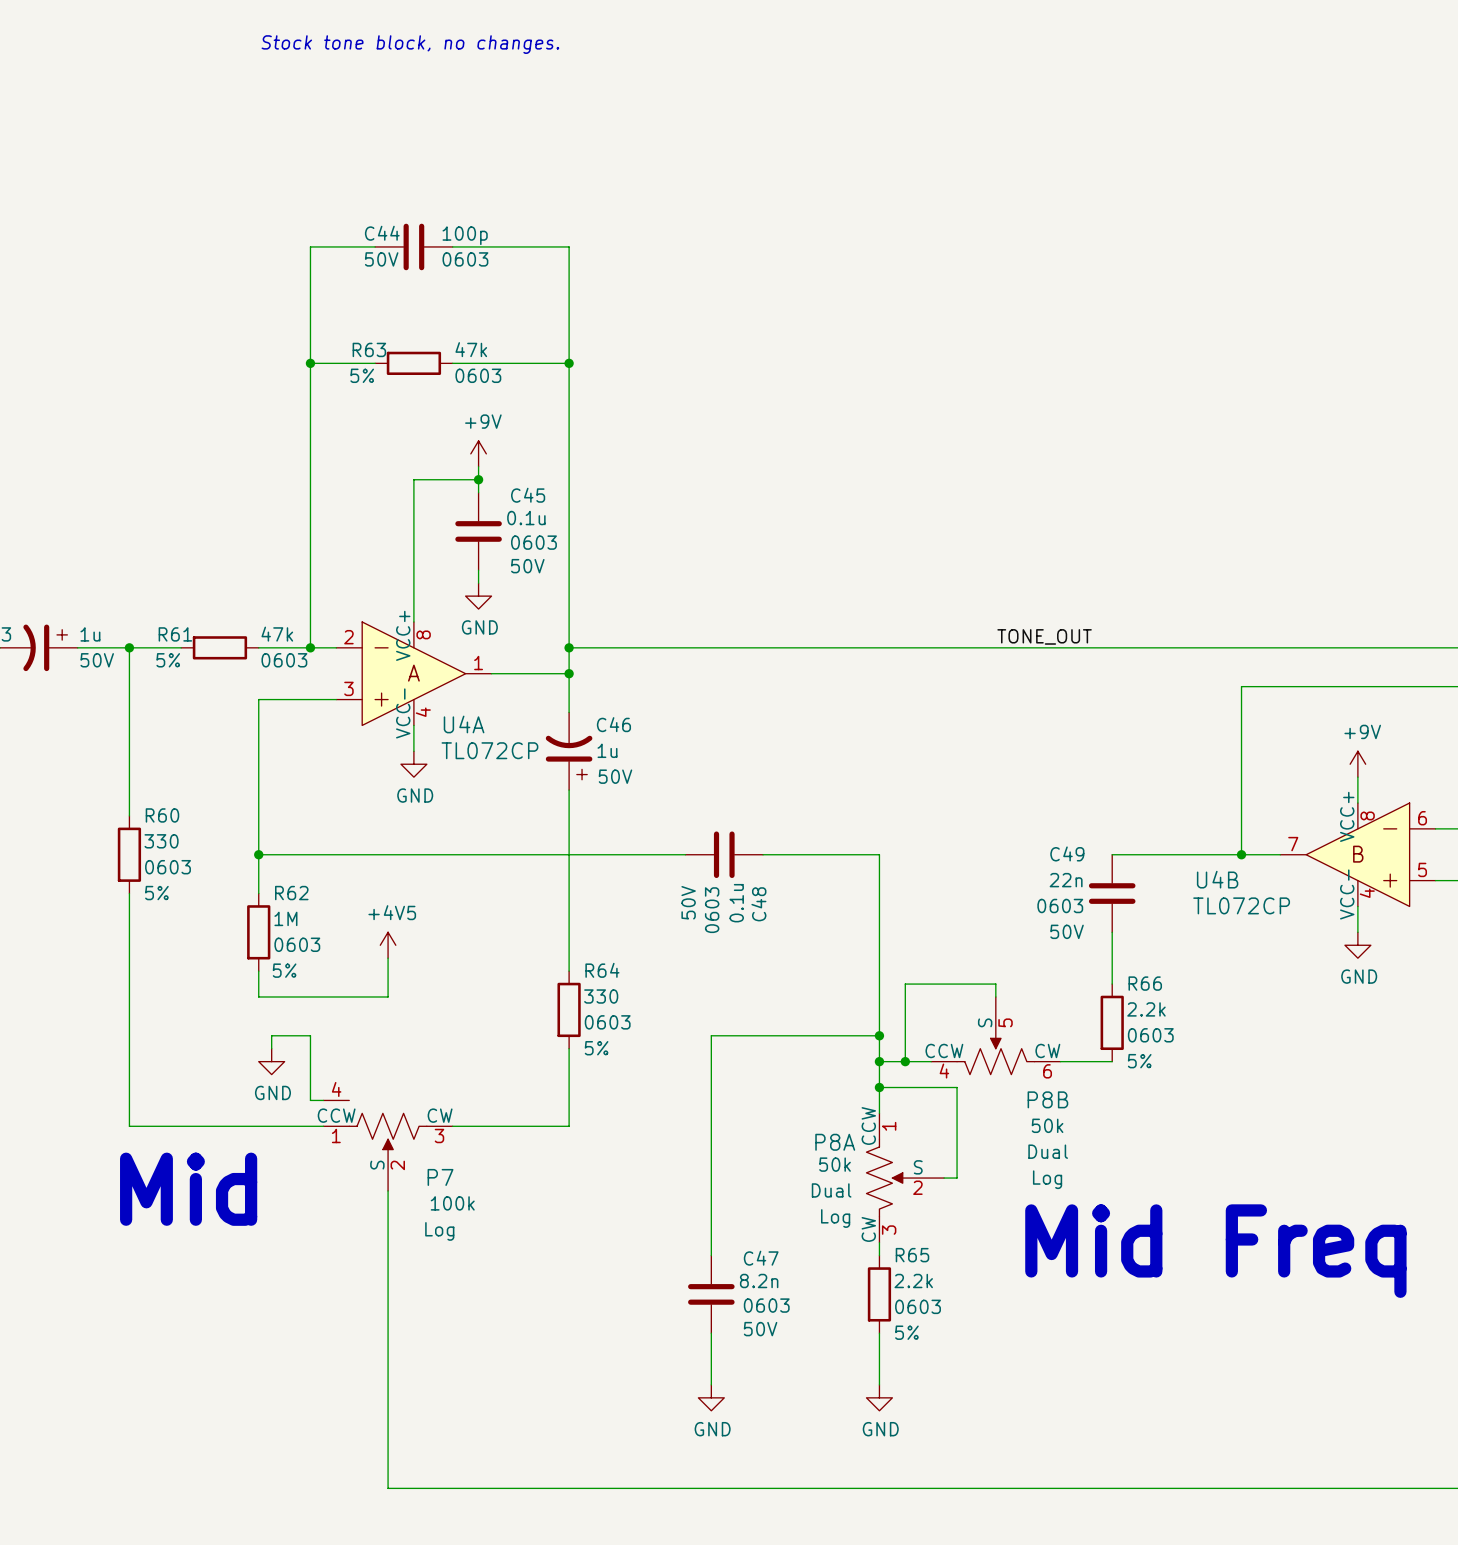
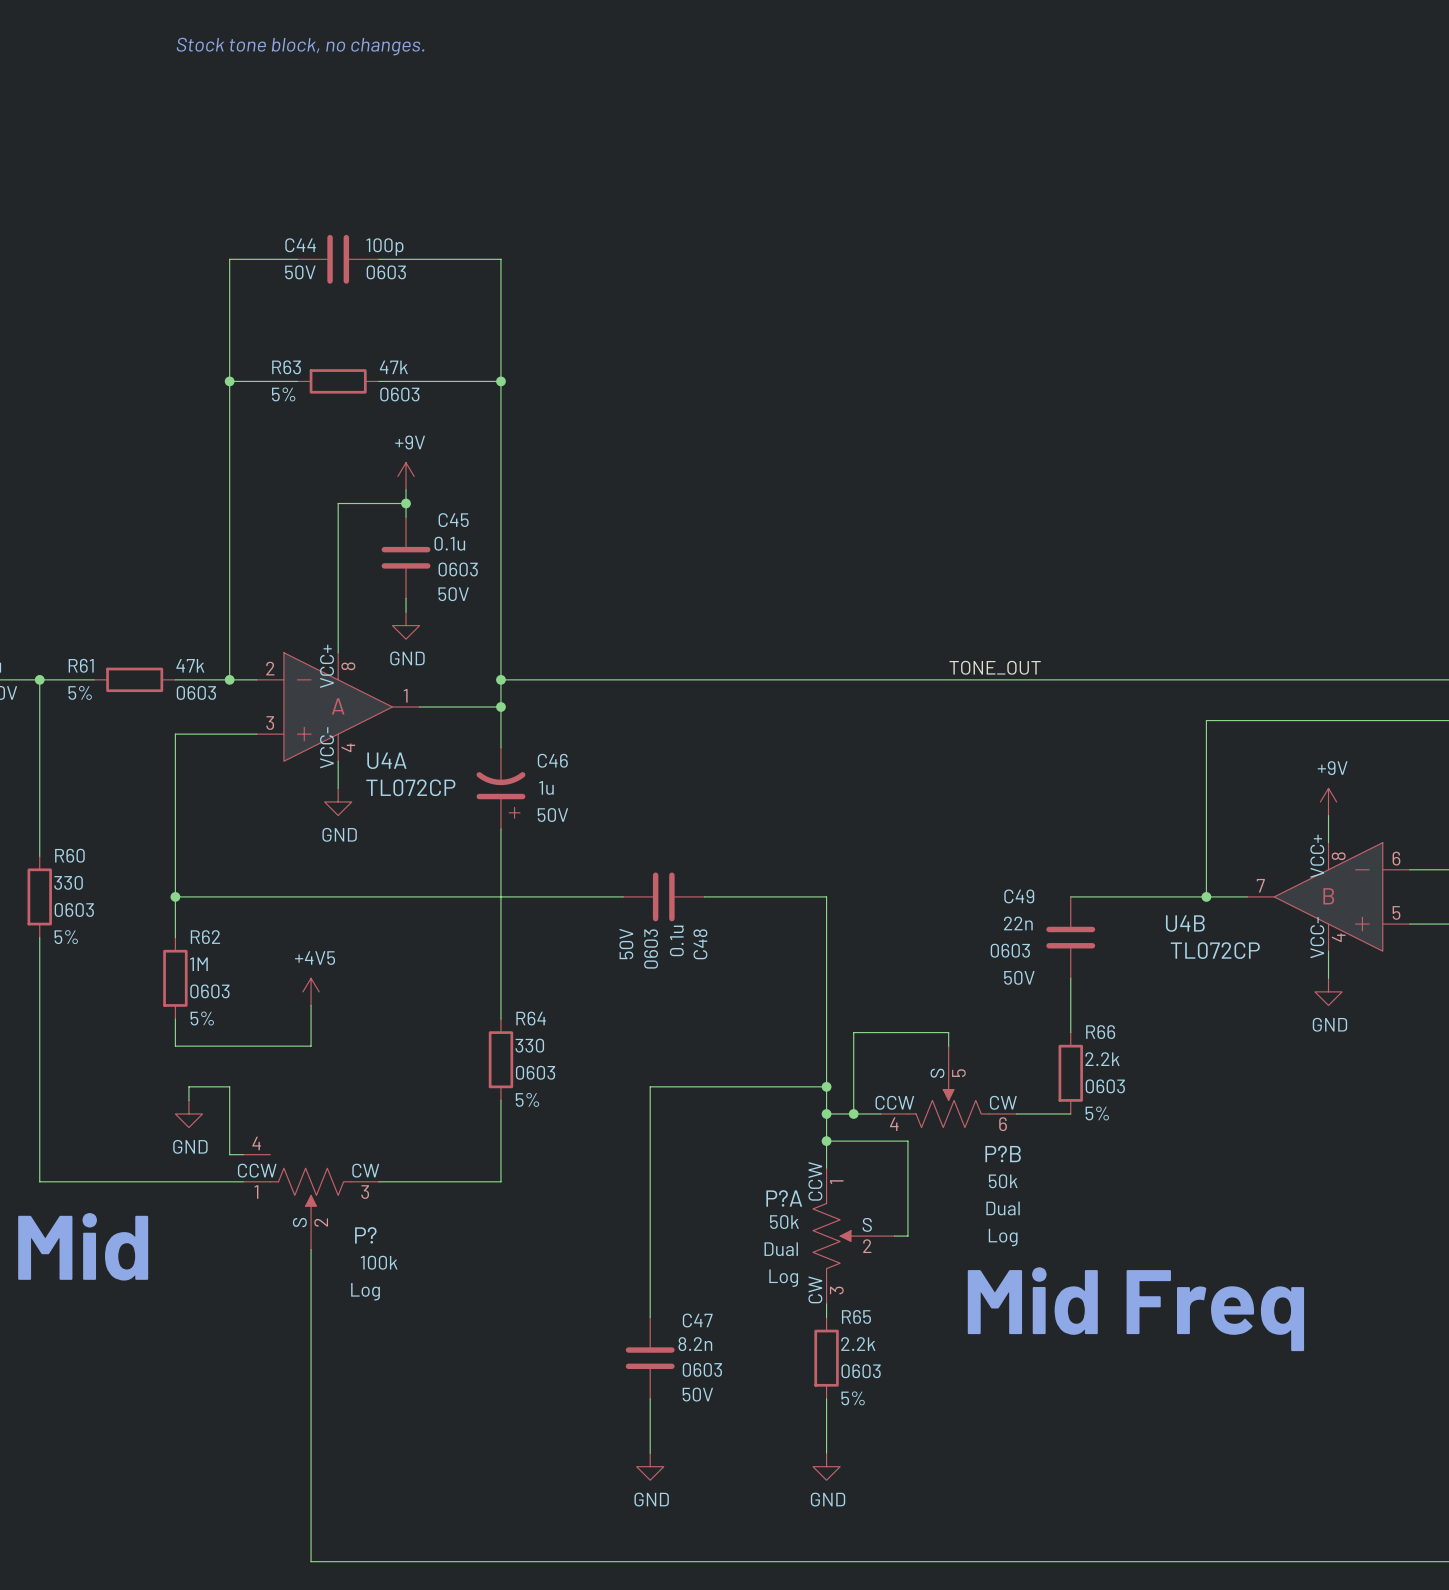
P8B name: P8B (1047, 1099) -> P?B (1003, 1153)
P8A name: P8A (835, 1142) -> P?A (784, 1198)
P7 name: P7 (440, 1177) -> P? (365, 1235)

